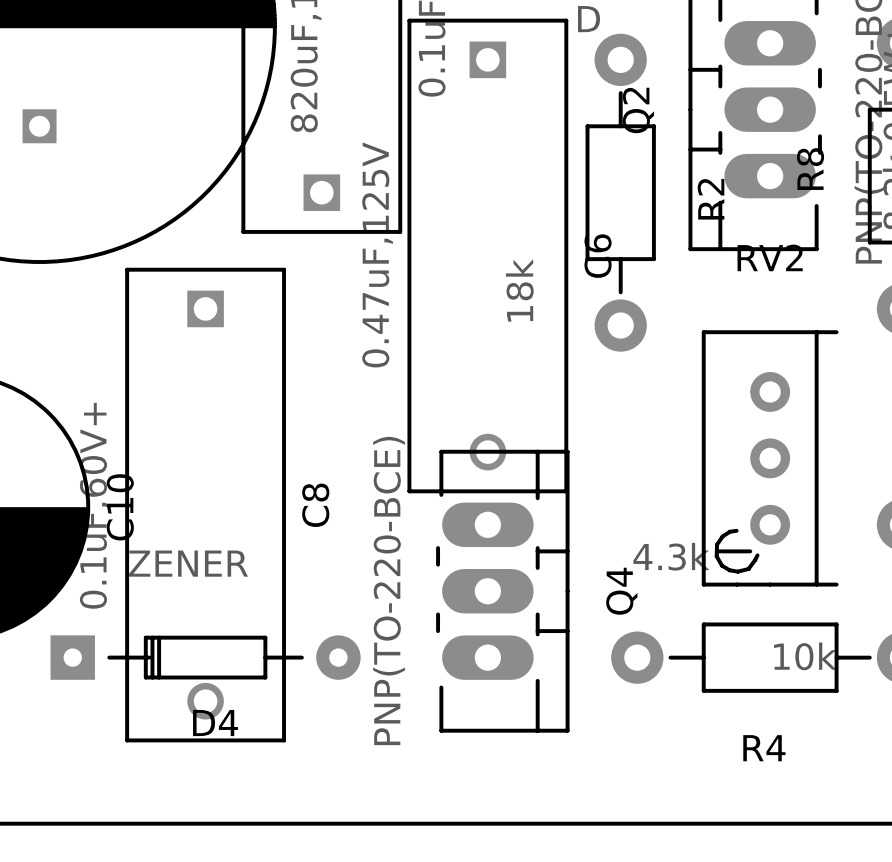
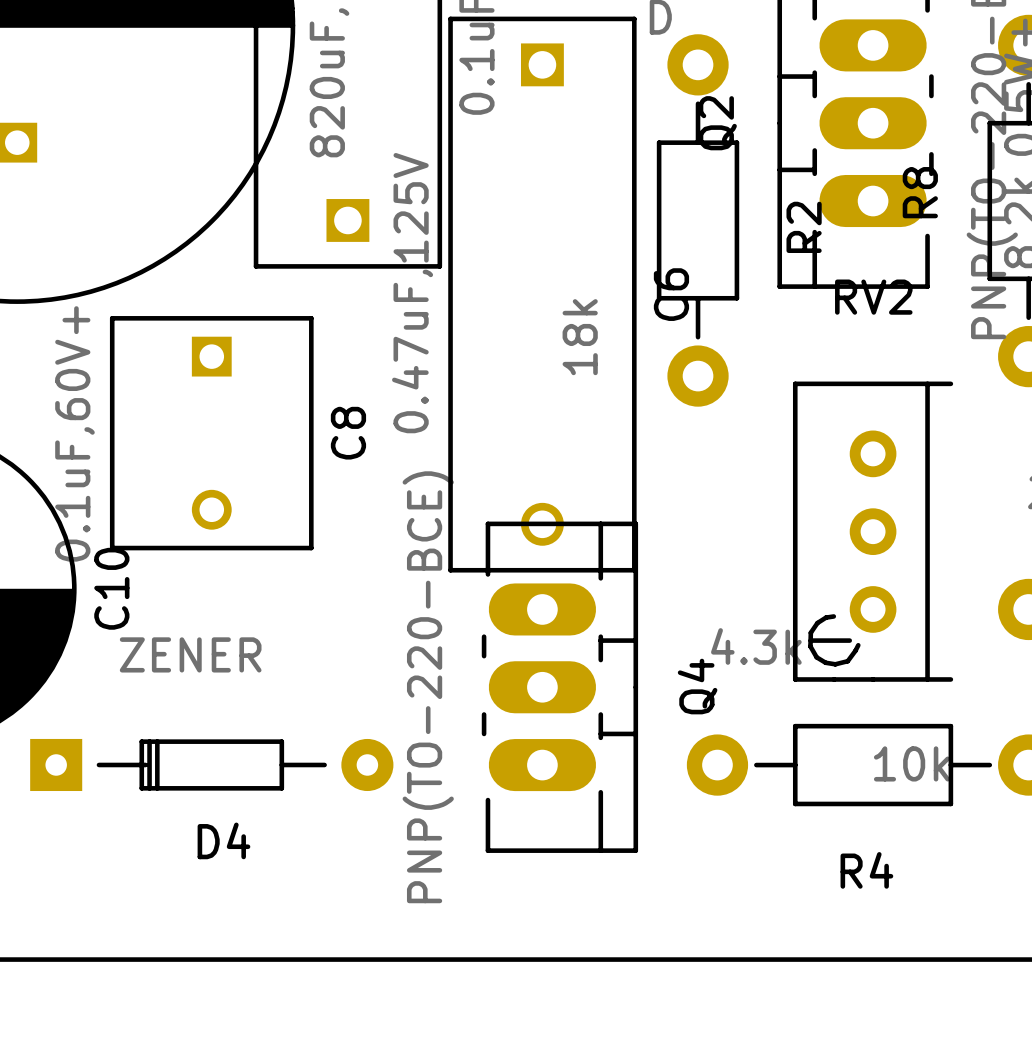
C8 footprint: [125, 267, 286, 743] -> [109, 316, 314, 551]

